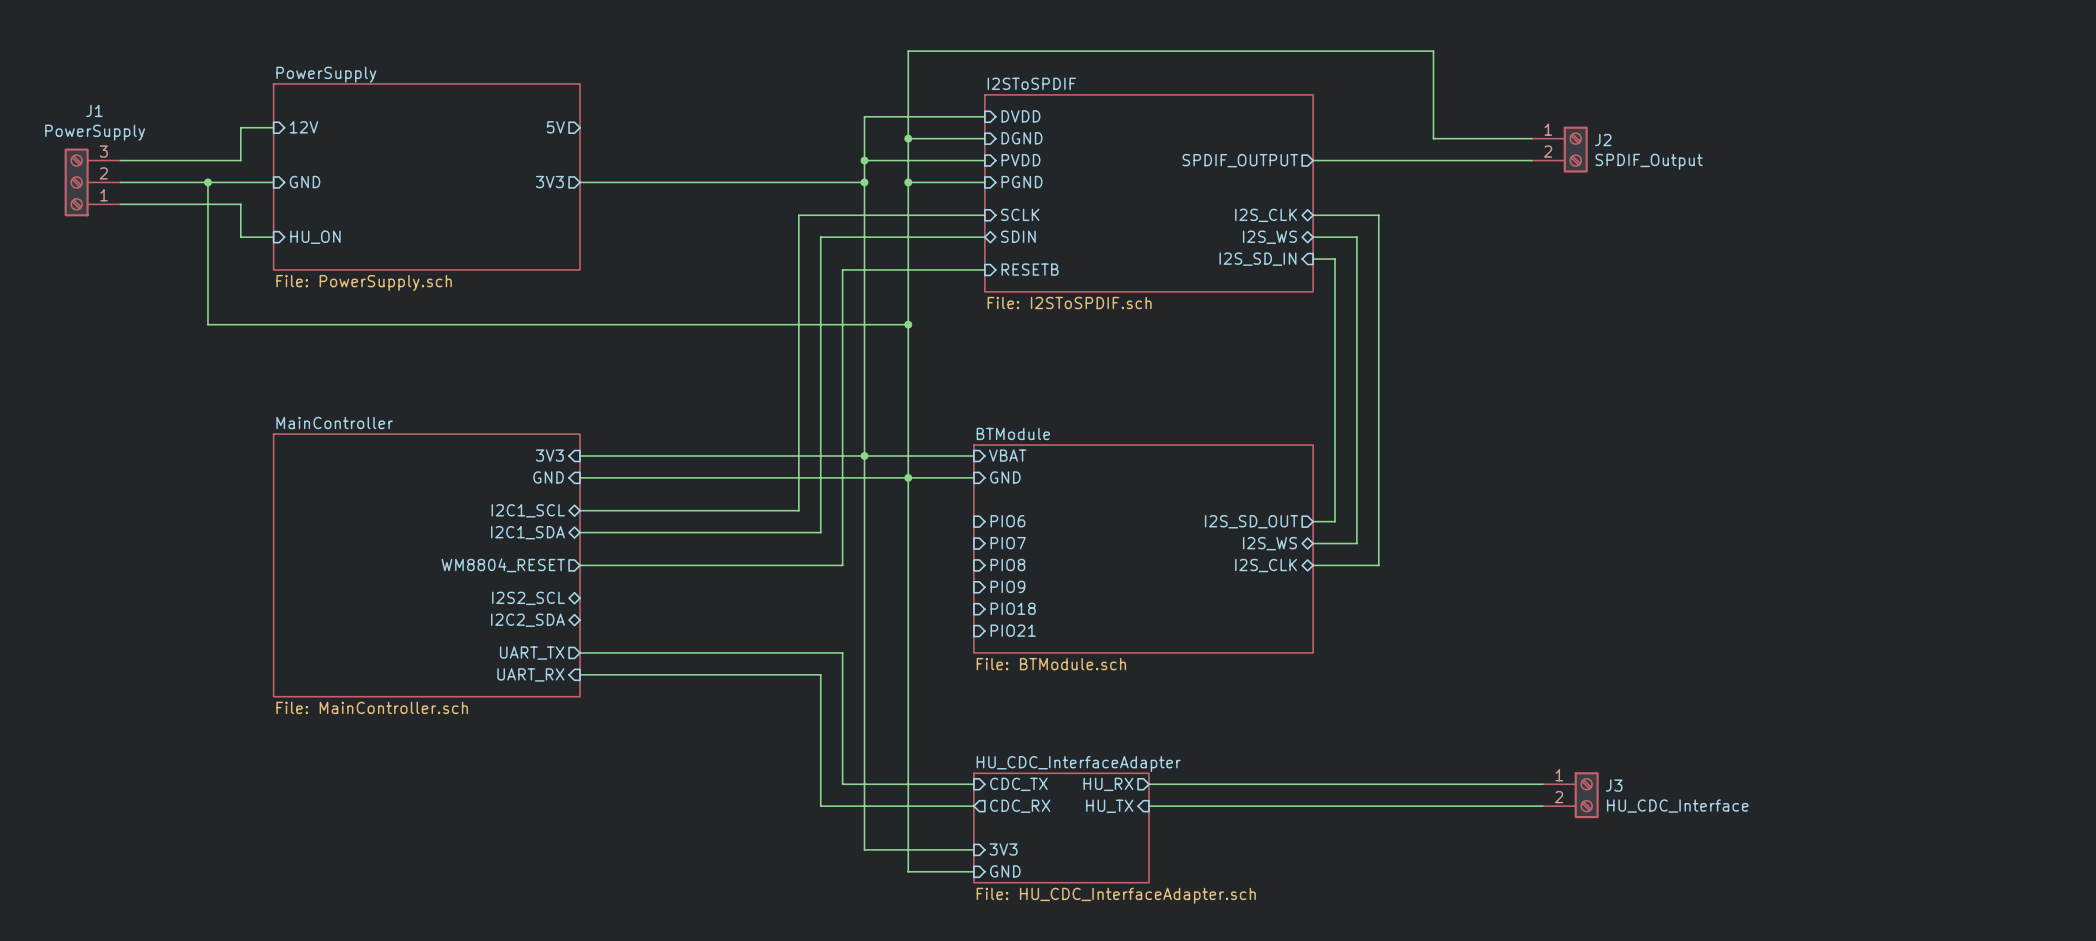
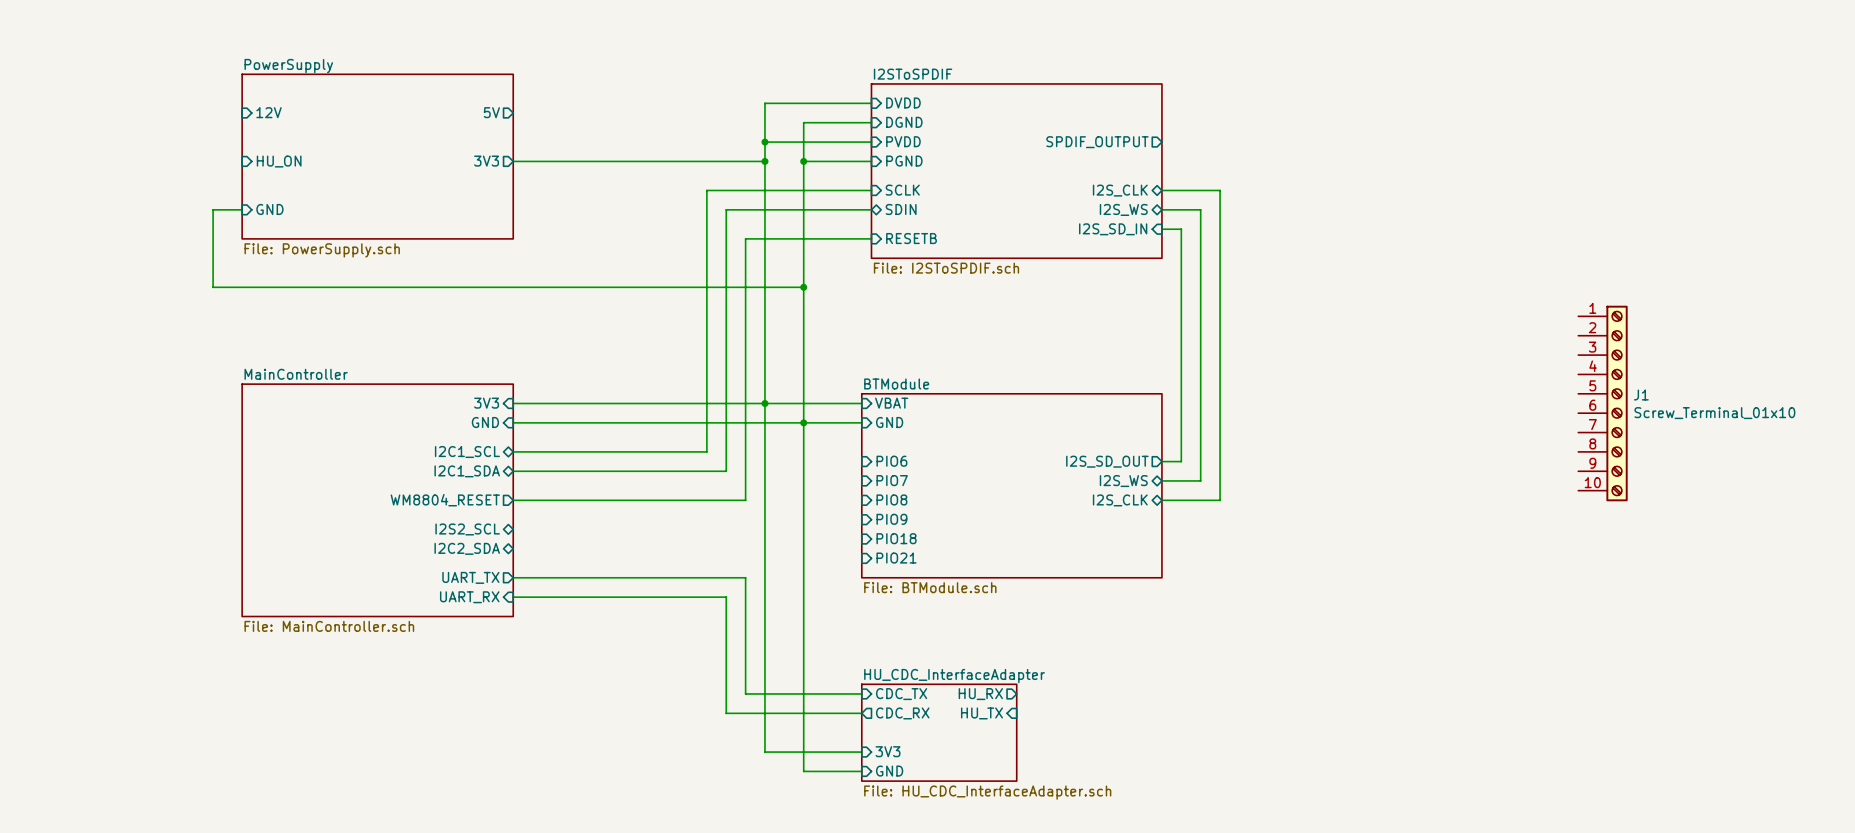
J1 name position: J1 (94, 110) -> J1 (1641, 395)
wire: (273, 127) (240, 127) (240, 160) (120, 160) -> none
J1 value: PowerSupply (95, 132) -> Screw_Terminal_01x10 (1714, 413)
wire: (908, 138) (908, 51) (1433, 51) (1433, 138) (1531, 138) -> none
junction: (908, 138) -> none
J1 symbol: [64, 148, 121, 217] -> [1578, 305, 1628, 502]
J2: SPDIF_Output (1559, 149) -> none
wire: (1313, 160) (1531, 160) -> none
wire: (120, 182) (273, 182) -> none
wire: (207, 182) (207, 324) (240, 324) -> (213, 209) (213, 287)
junction: (207, 182) -> none
sheet pin: GND (305, 182) -> HU_ON (279, 161)
wire: (120, 204) (240, 204) (240, 237) -> none
sheet pin: HU_ON (315, 237) -> GND (269, 209)
wire: (1148, 784) (1542, 784) -> none
J3: HU_CDC_Interface (1570, 795) -> none
wire: (1148, 806) (1542, 806) -> none

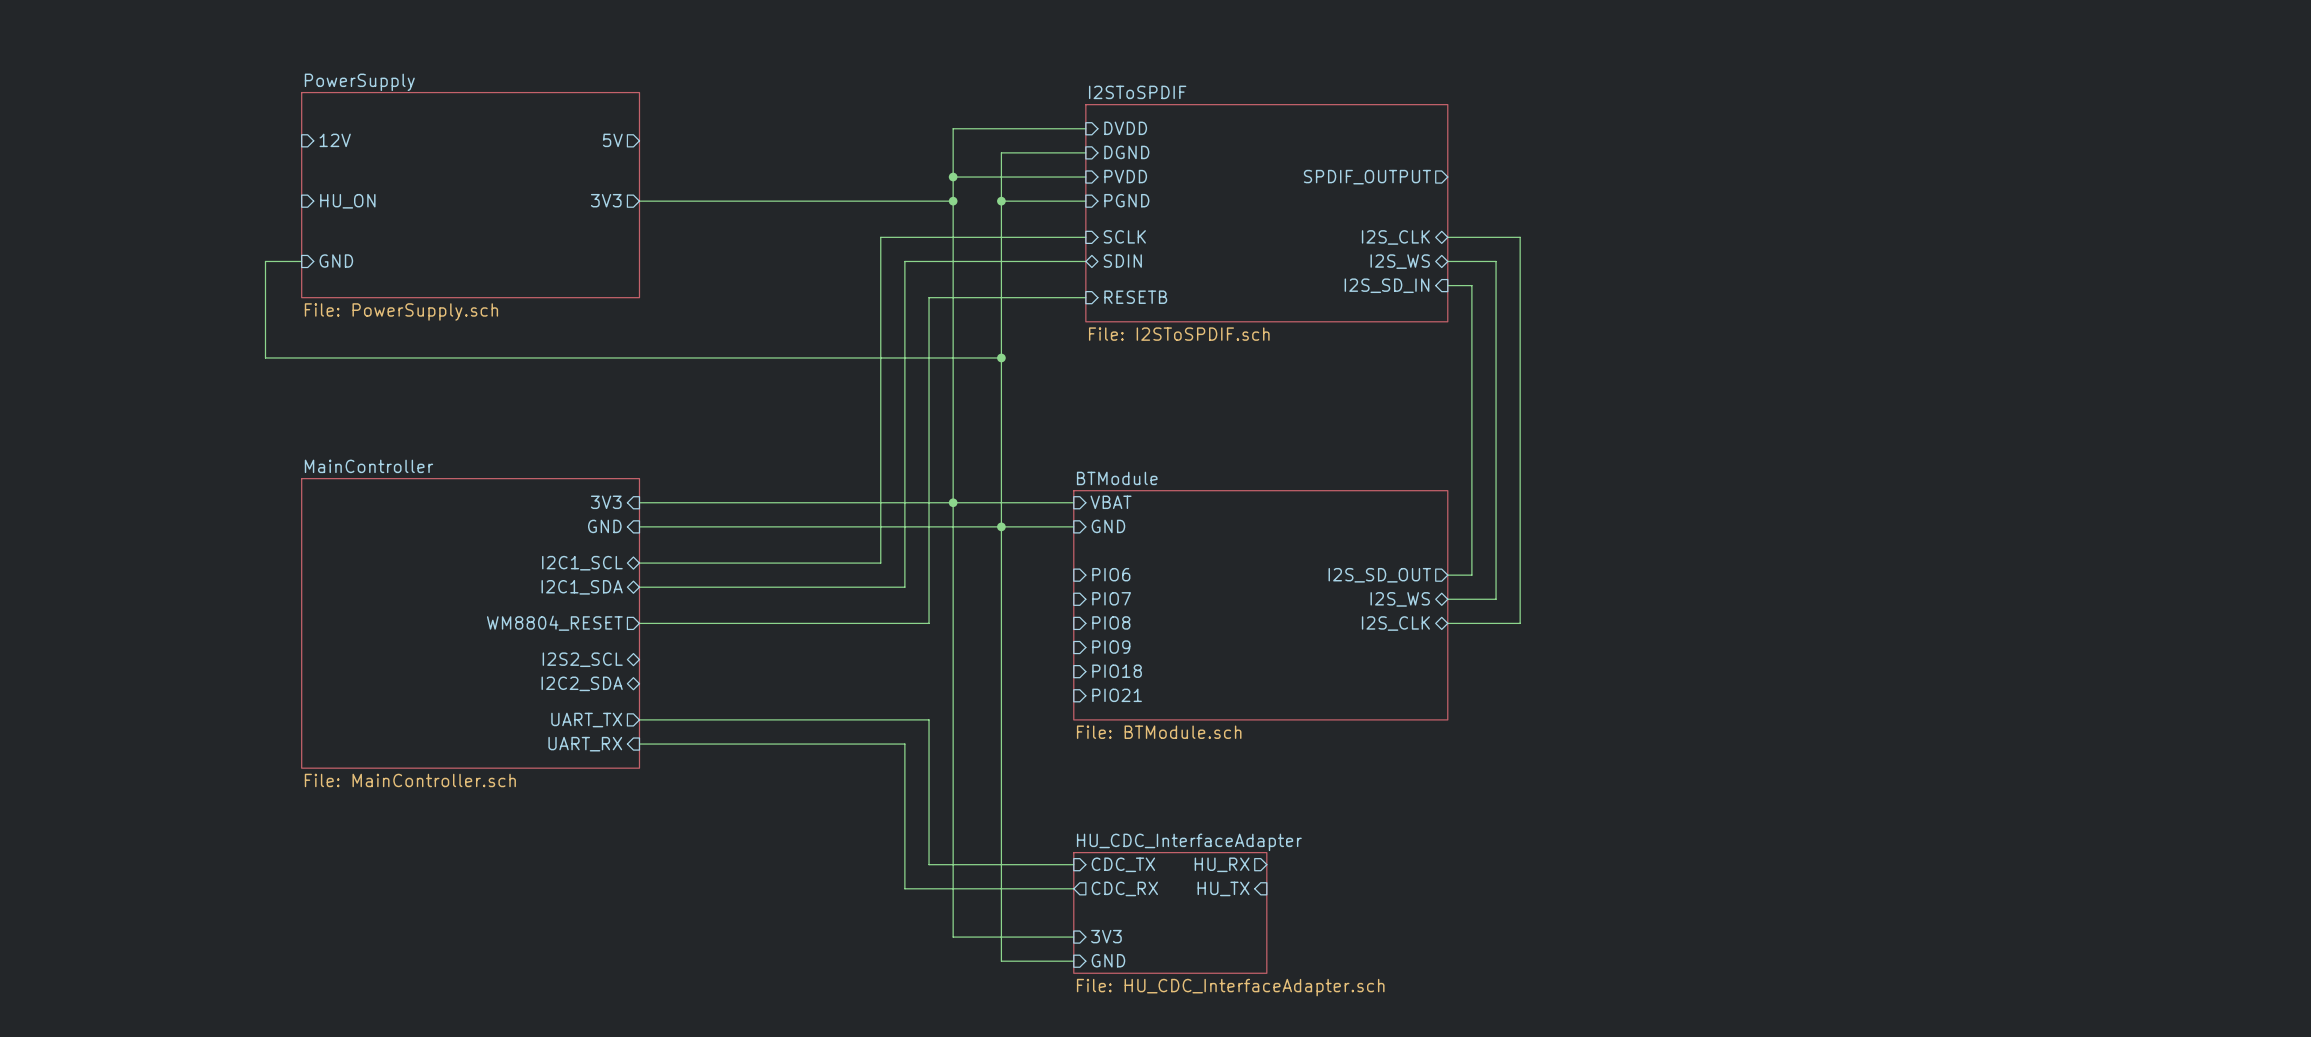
J1: Screw_Terminal_01x10 (1602, 403) -> none

